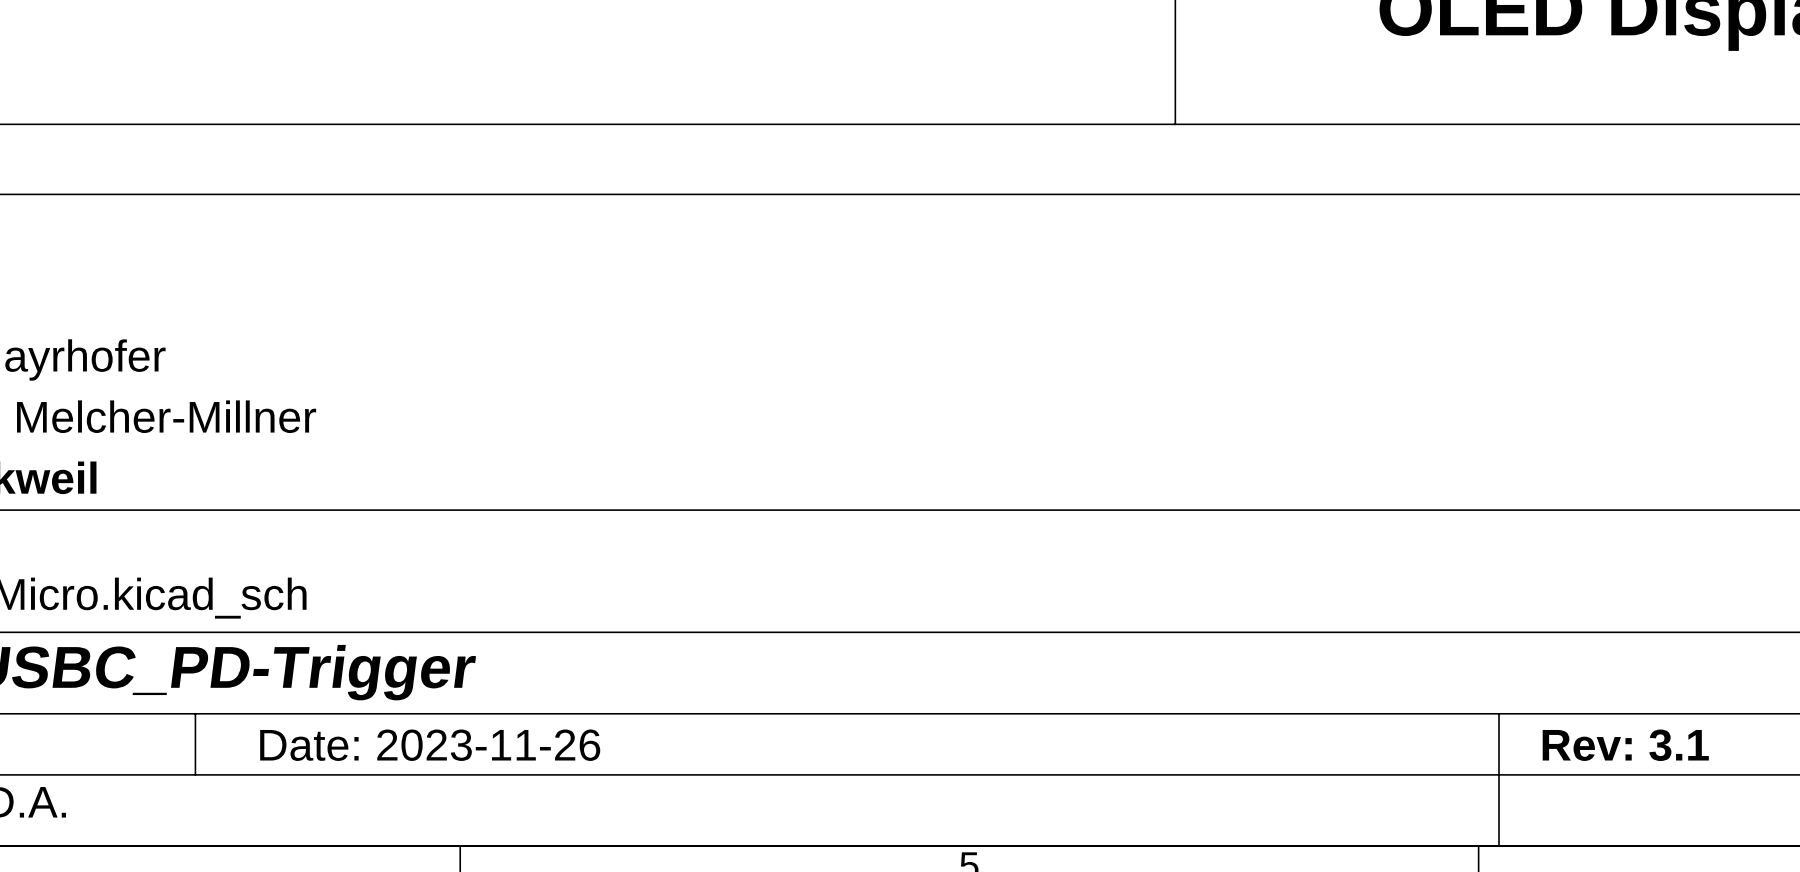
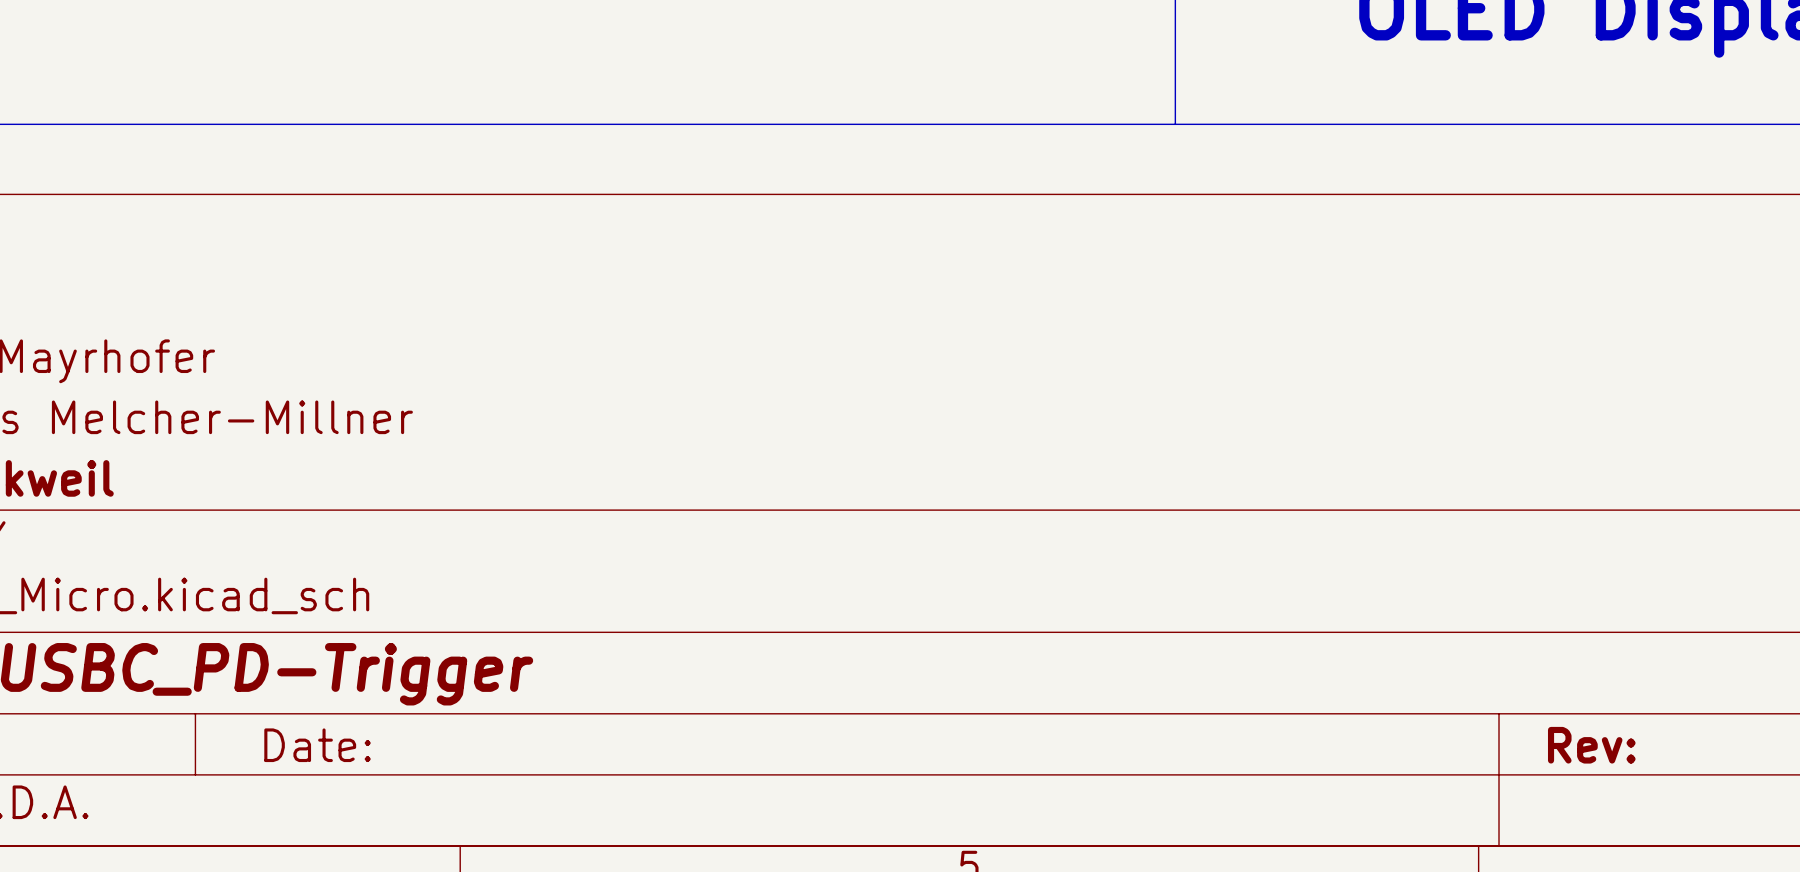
title block: Date: 2023-11-26 (430, 745) -> Date: (317, 745)
title block: Rev: 3.1 (1625, 745) -> Rev: (1591, 745)

